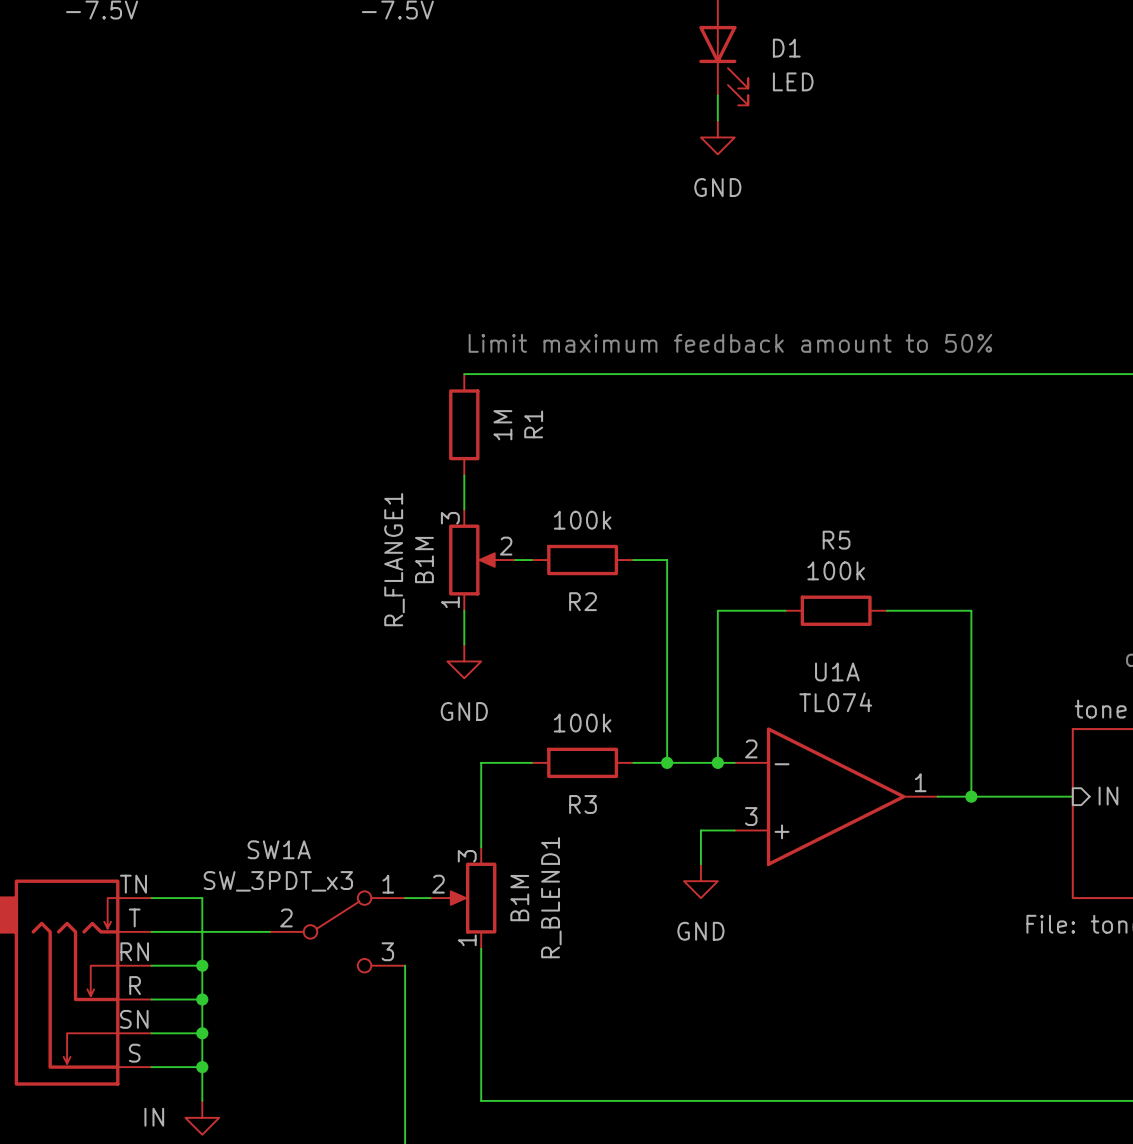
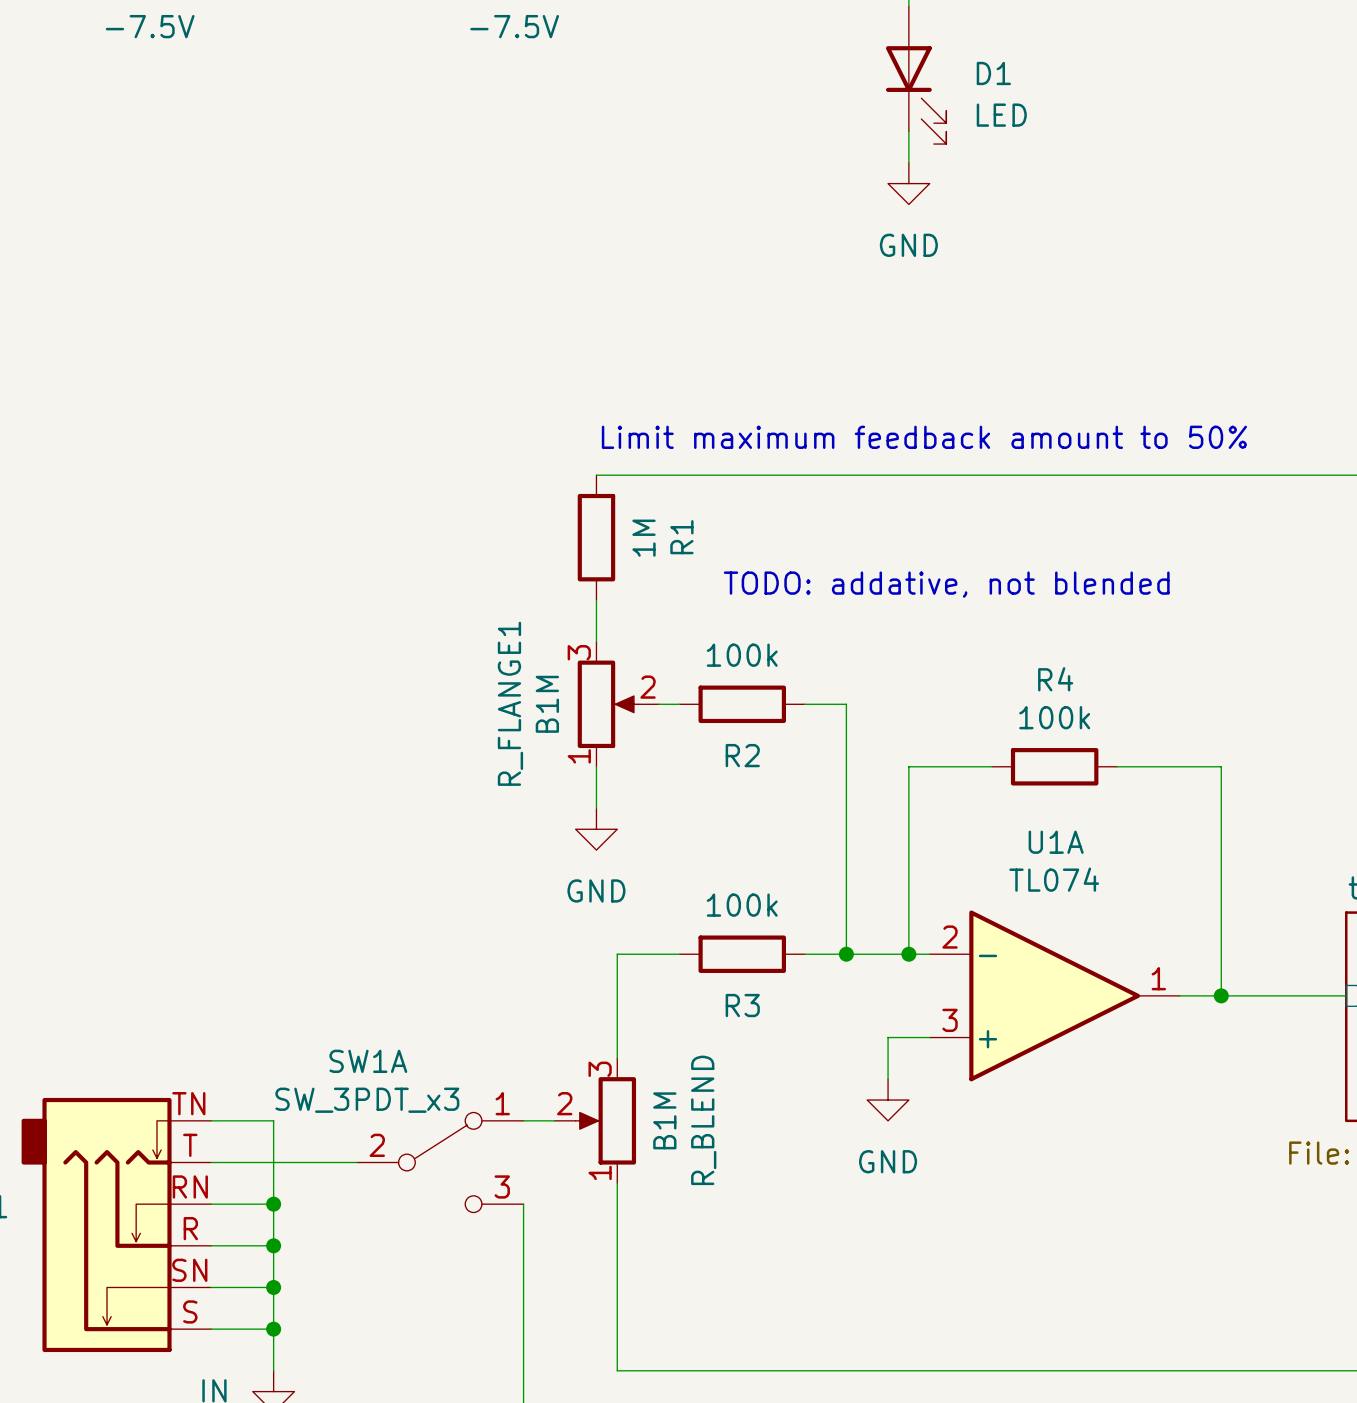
text: none -> TODO: addative, not blended (946, 584)
R5 name: R5 (836, 540) -> R4 (1055, 679)
R_BLEND1 name: R_BLEND1 (551, 897) -> R_BLEND (703, 1120)

